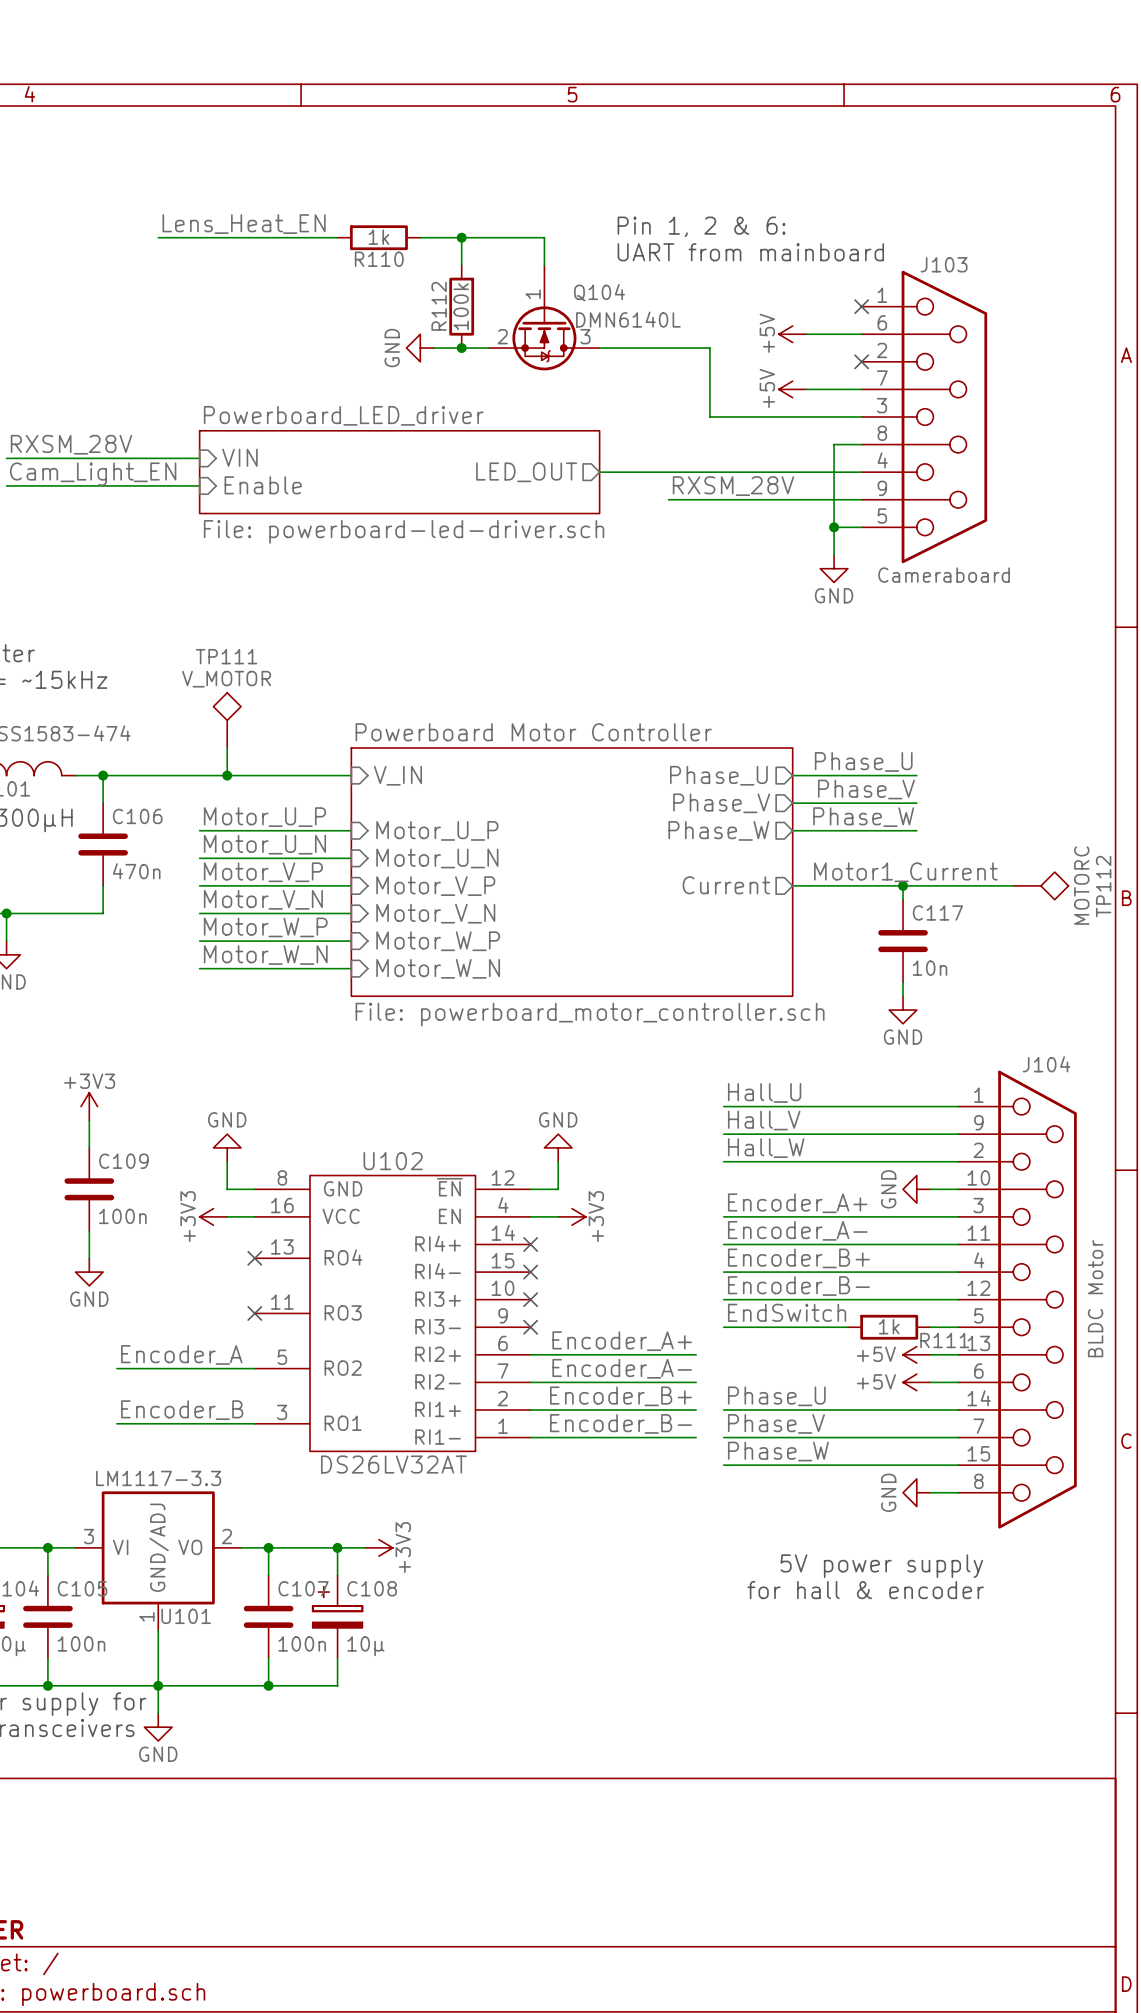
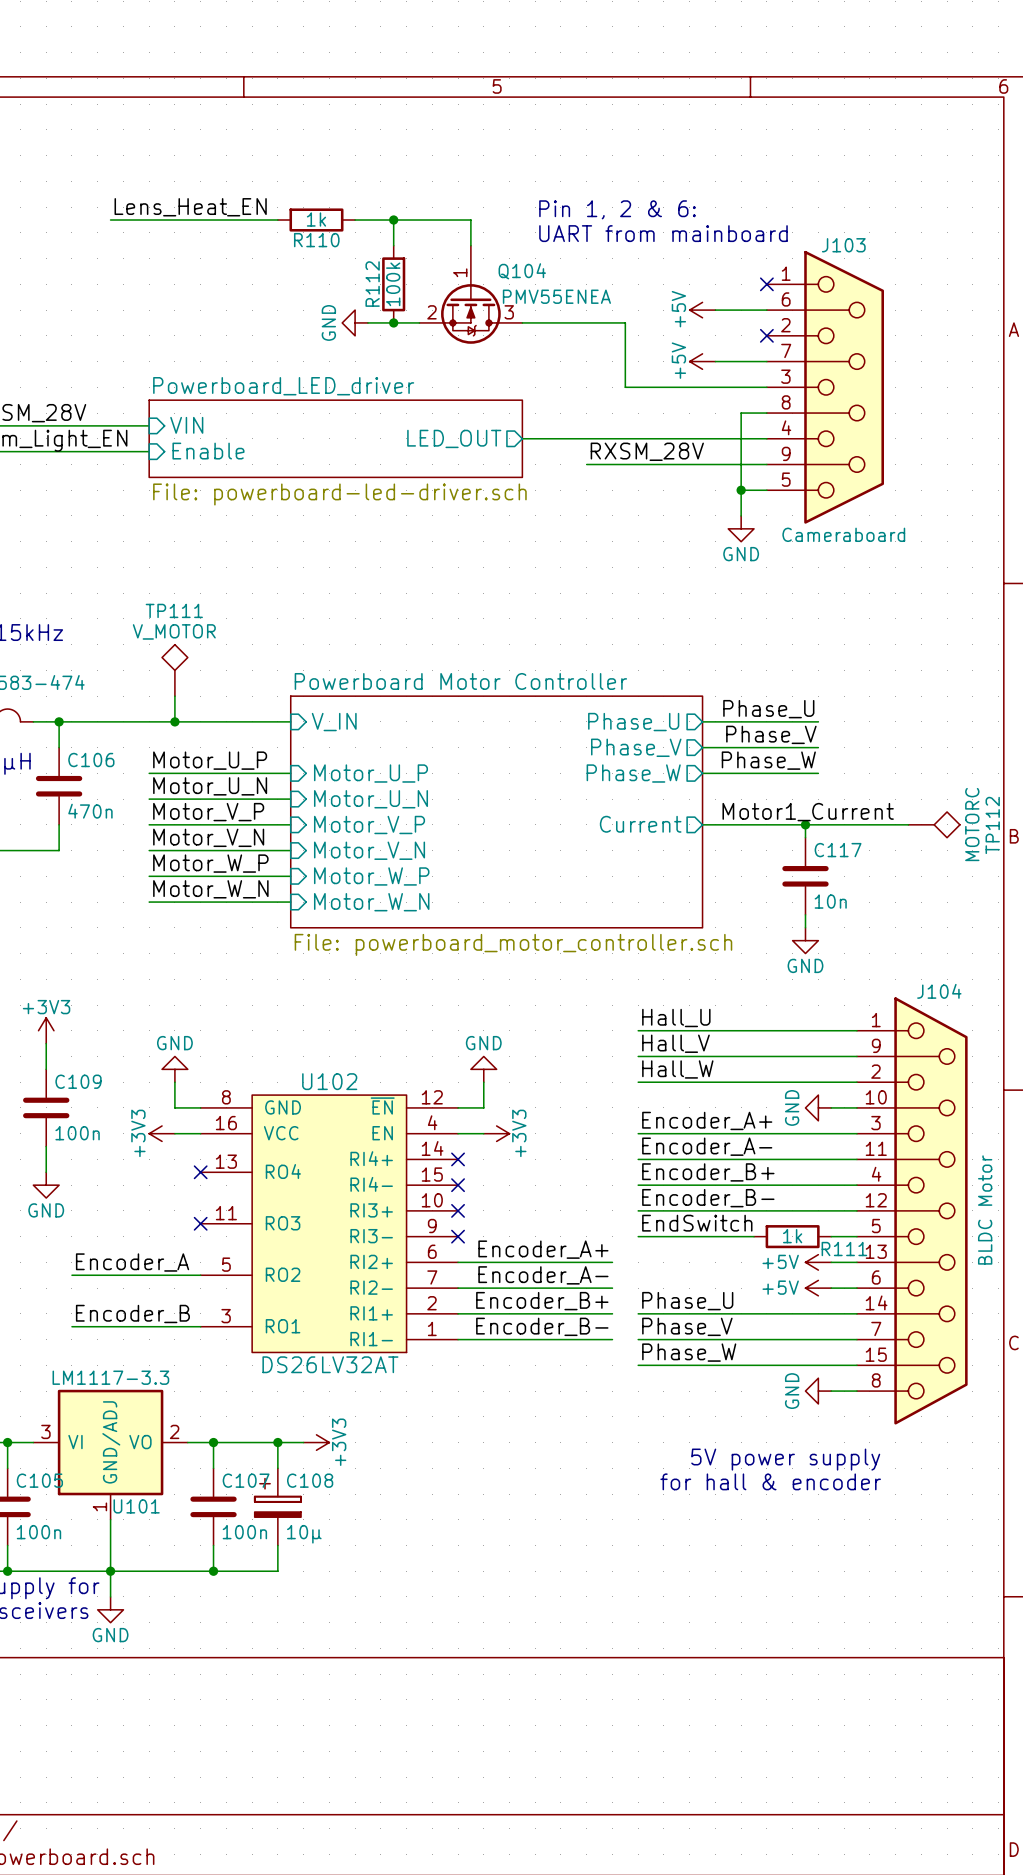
Q104 value: DMN6140L (628, 319) -> PMV55ENEA (556, 296)

